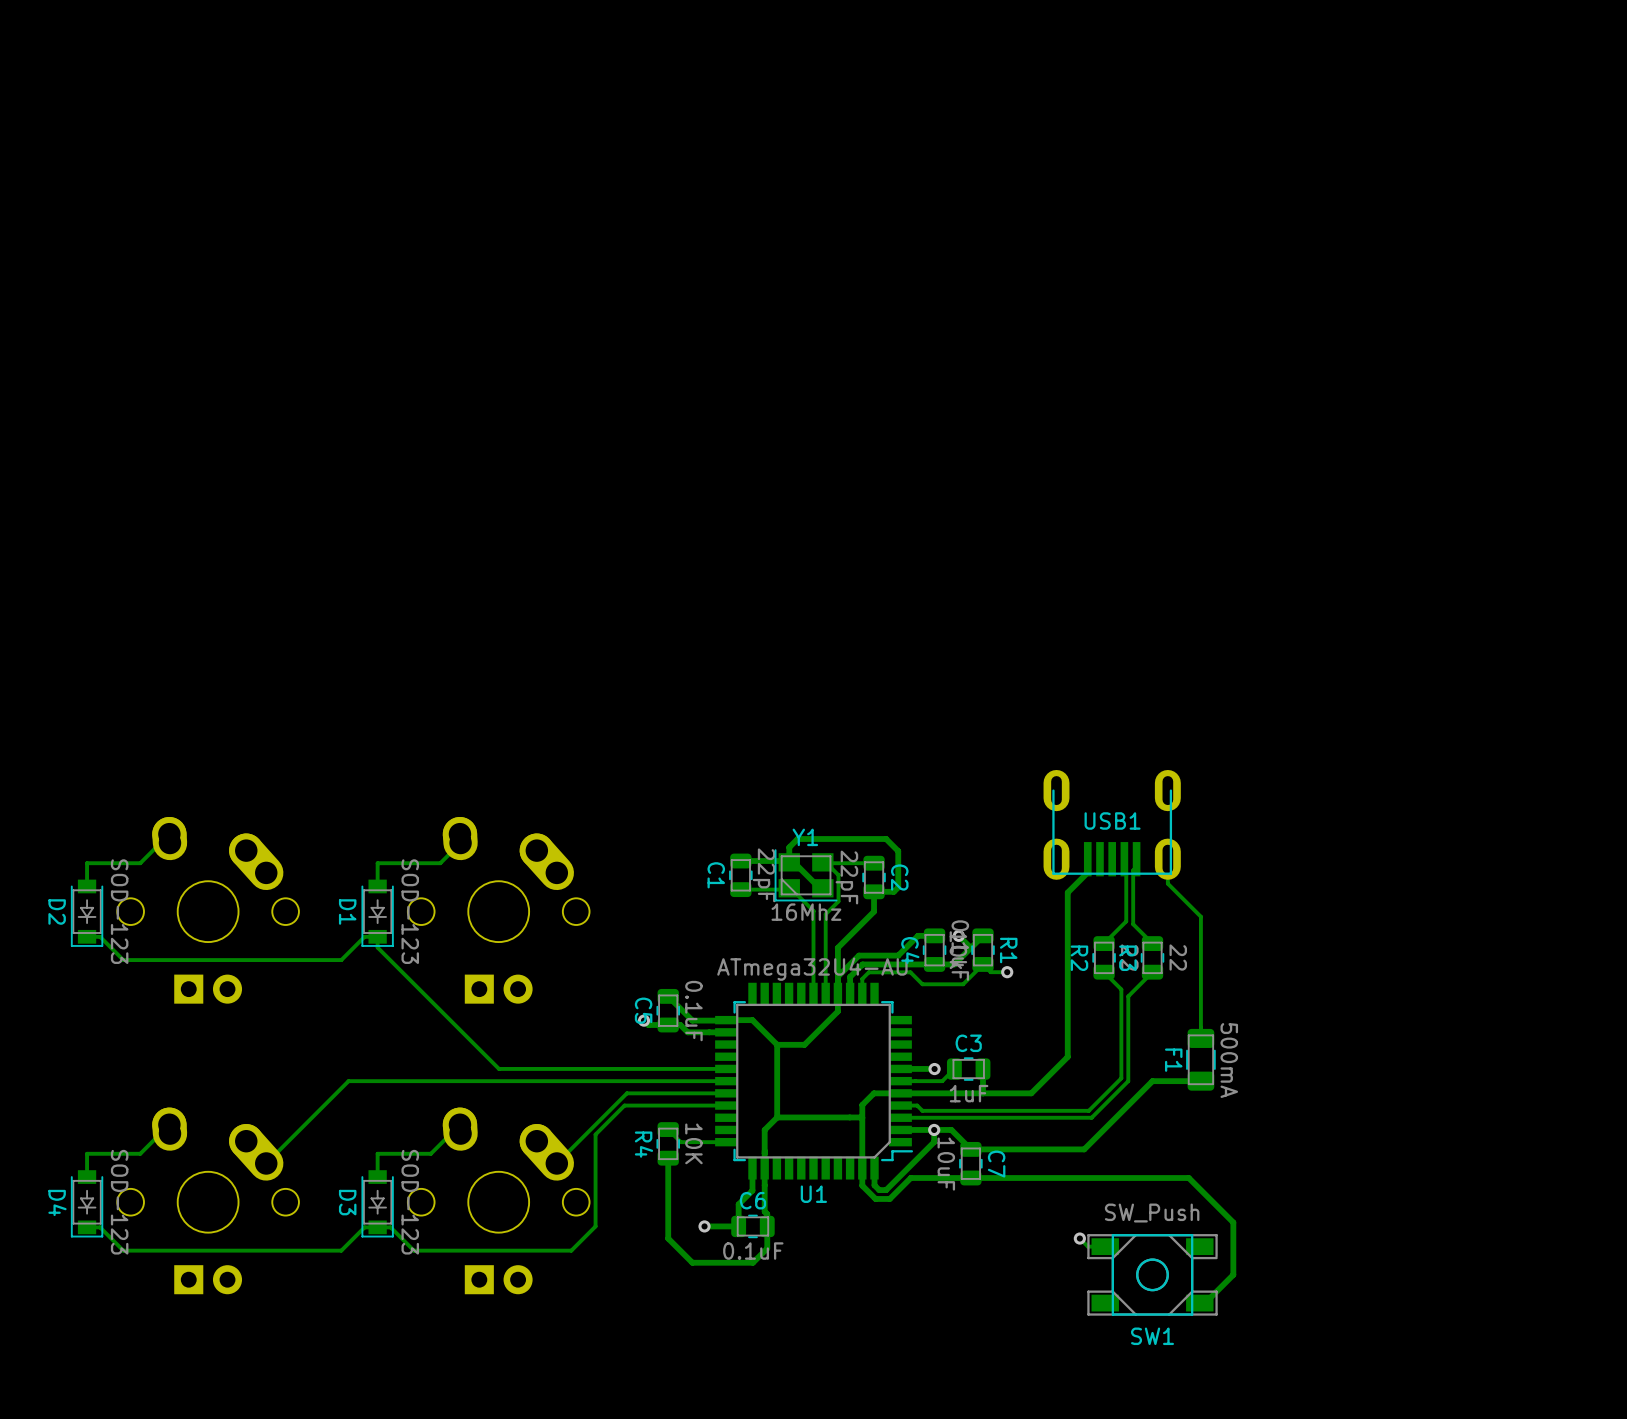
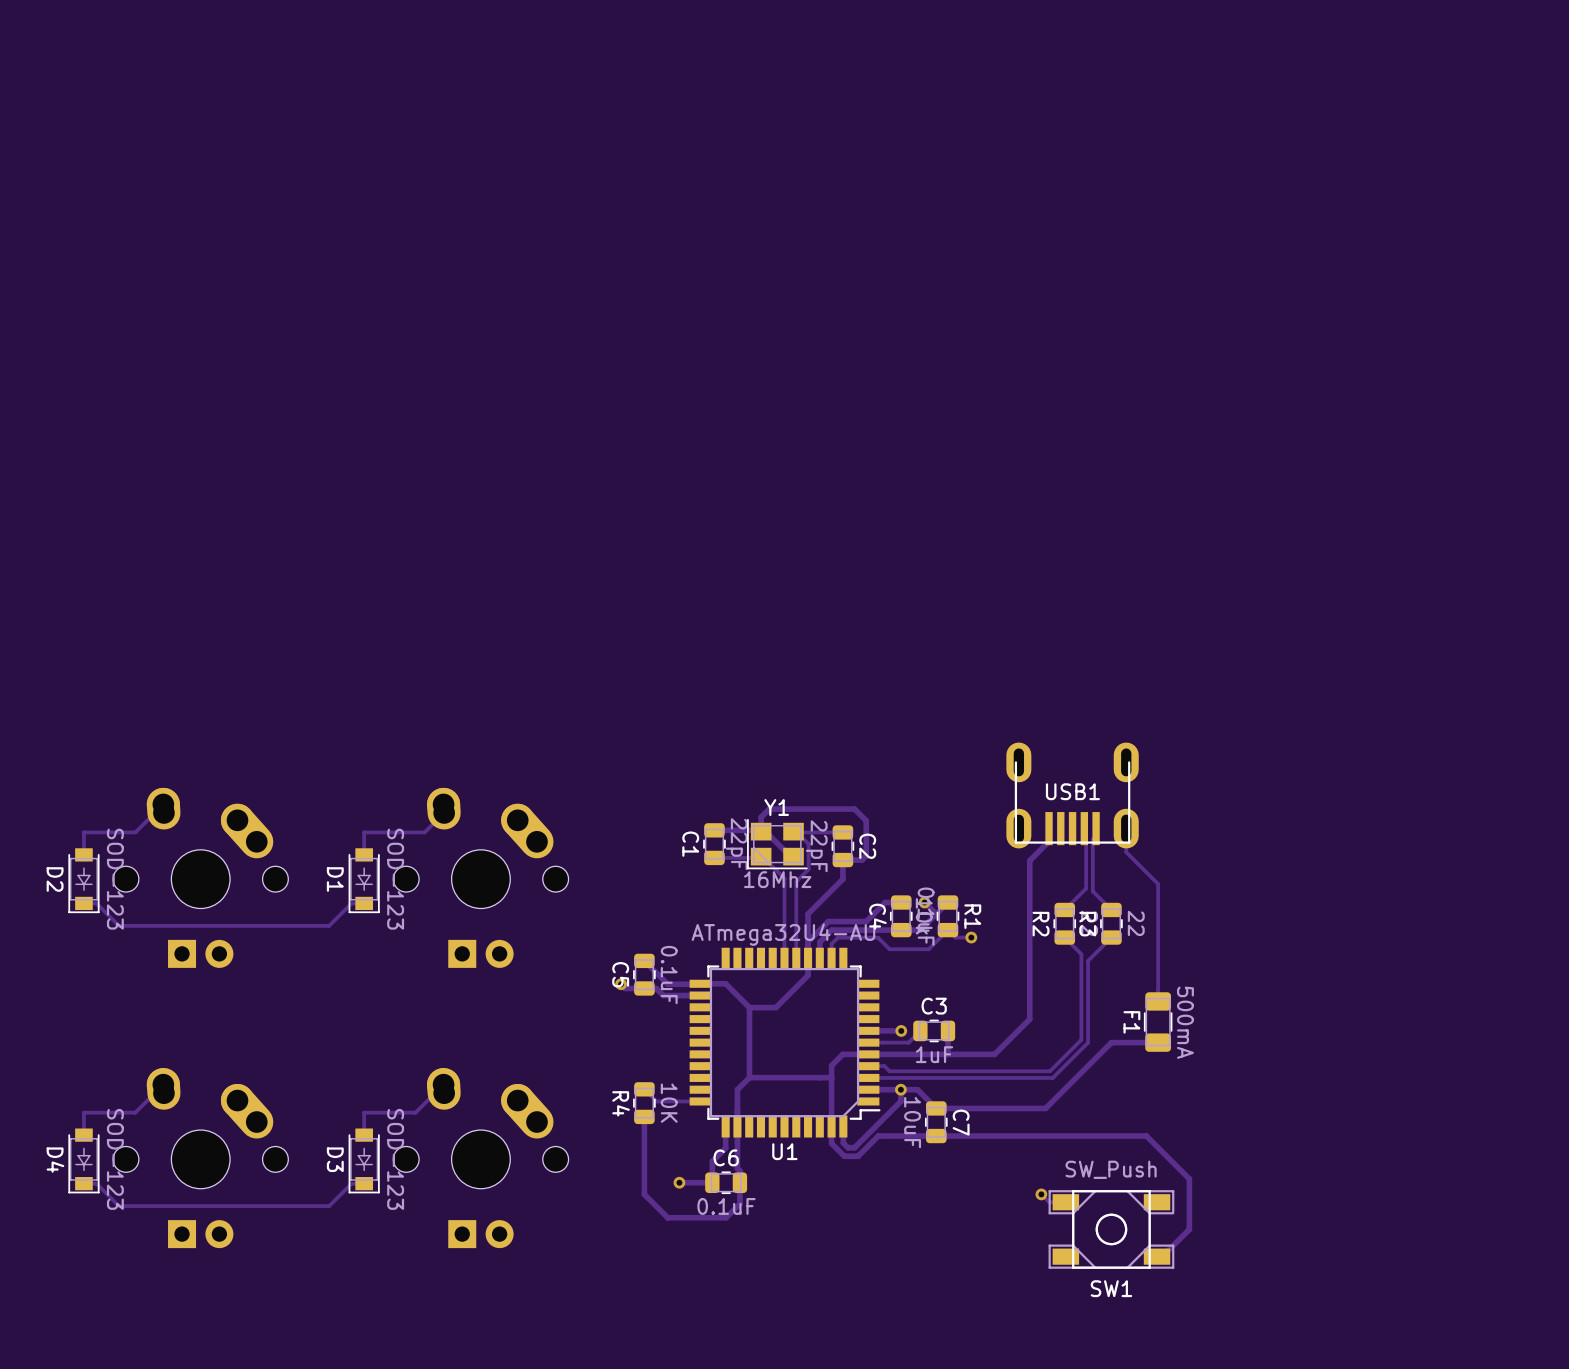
track: (377, 936) (377, 947) (499, 1068) (726, 1068) -> none
track: (726, 1081) (348, 1081) (266, 1163) -> none
track: (726, 1093) (626, 1093) (556, 1163) -> none
track: (726, 1105) (624, 1105) (595, 1134) (595, 1226) (571, 1250) (413, 1250) (390, 1227) (377, 1227) -> none

